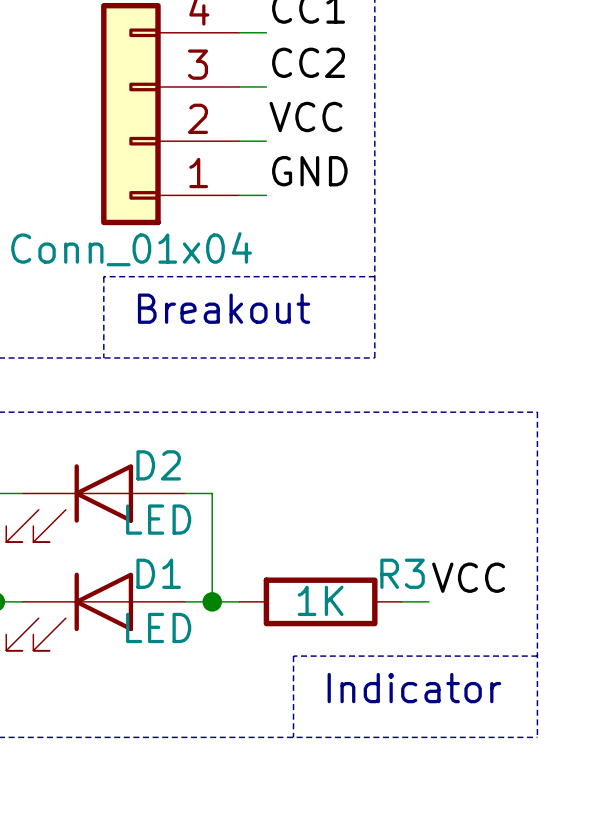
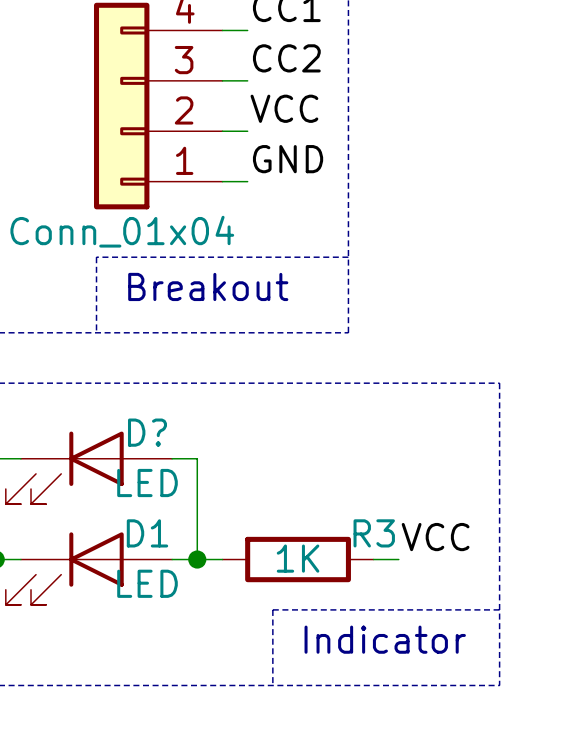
D2 name: D2 (158, 465) -> D? (147, 432)

